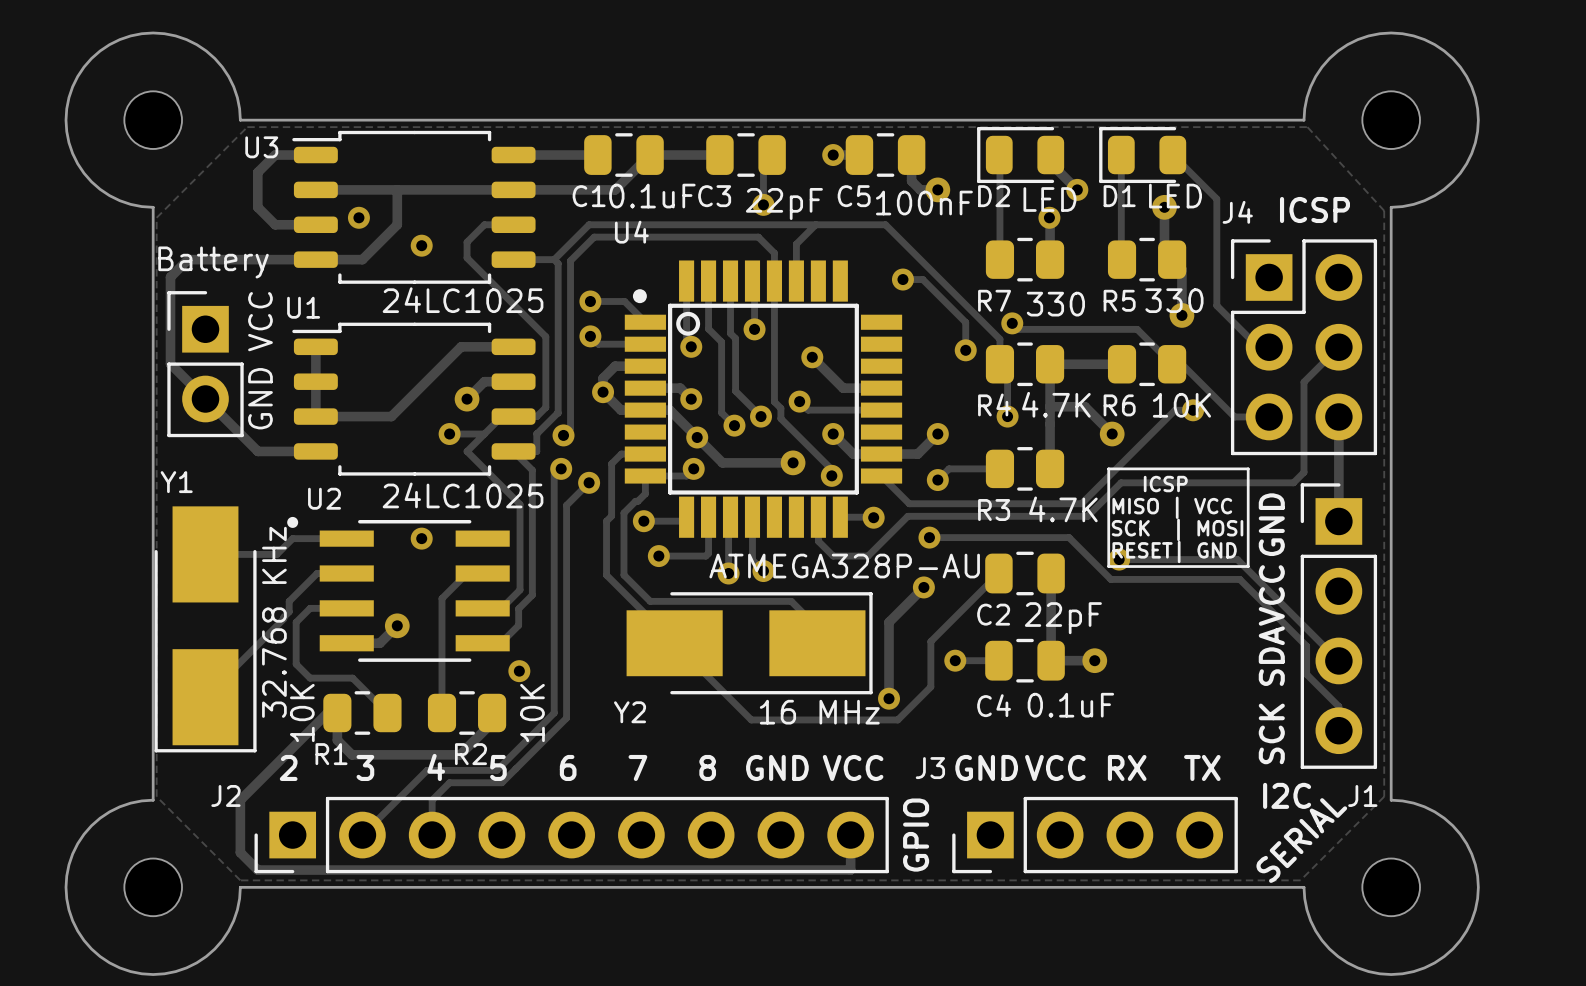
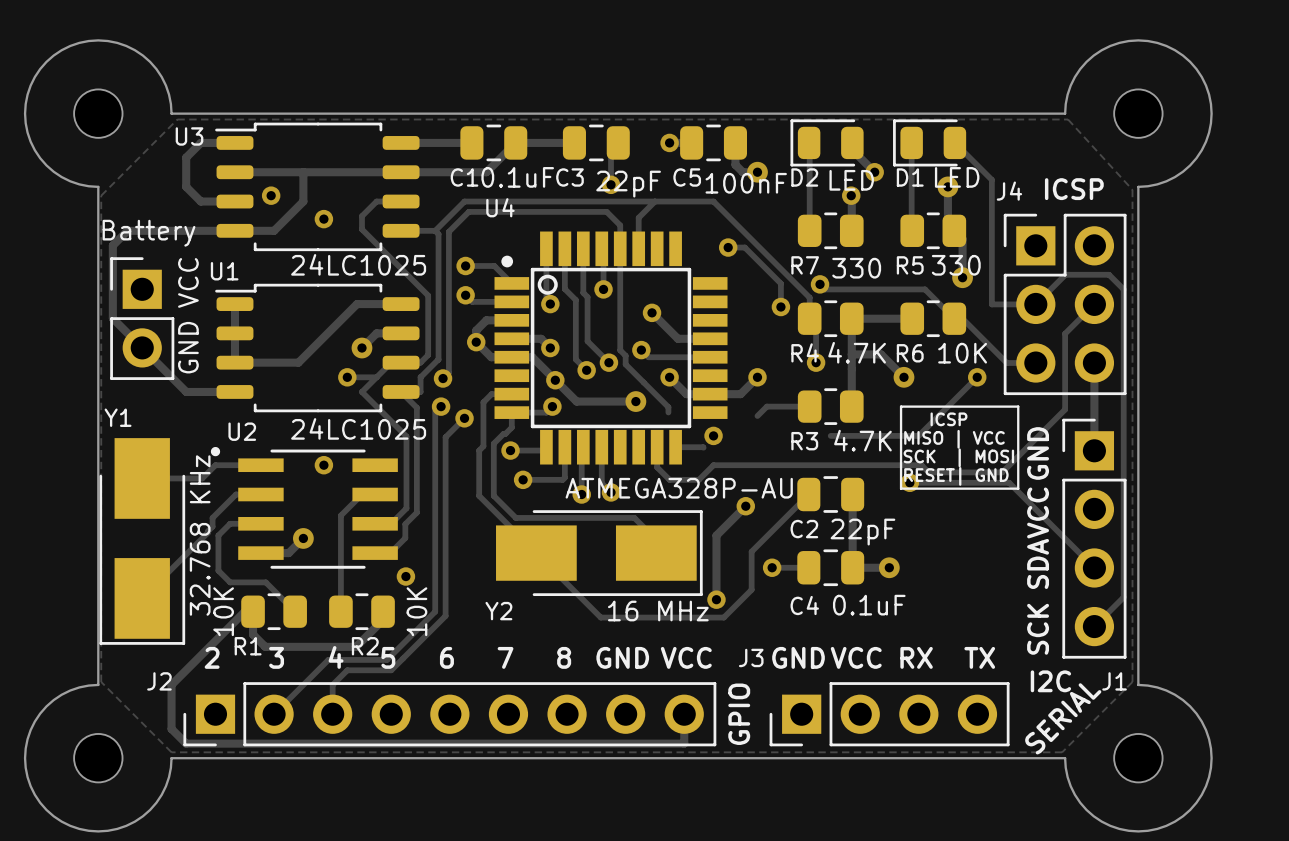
track: (1216, 305) (1258, 347) -> (991, 269) (991, 304) (1026, 304)
track: (1193, 410) (1174, 410) (1081, 503) -> (977, 377) (918, 435) (878, 435)
via position: (1193, 410) -> (977, 377)
via: (831, 475) -> none
track: (881, 476) (909, 503) (1025, 503) -> none
via: (937, 480) -> none
track: (1293, 482) (1121, 482) (1087, 516) (907, 516) (885, 538) -> (1056, 418) (1002, 472) (928, 472) (921, 465) (713, 465)
via position: (873, 517) -> (713, 435)
track: (929, 537) (1069, 537) (1110, 579) (1239, 579) (1306, 646) (1306, 674) (1338, 706) (1338, 730) -> (1035, 304) (1065, 274) (1109, 274) (1123, 289) (1123, 597) (1094, 626)
via: (929, 537) -> none

